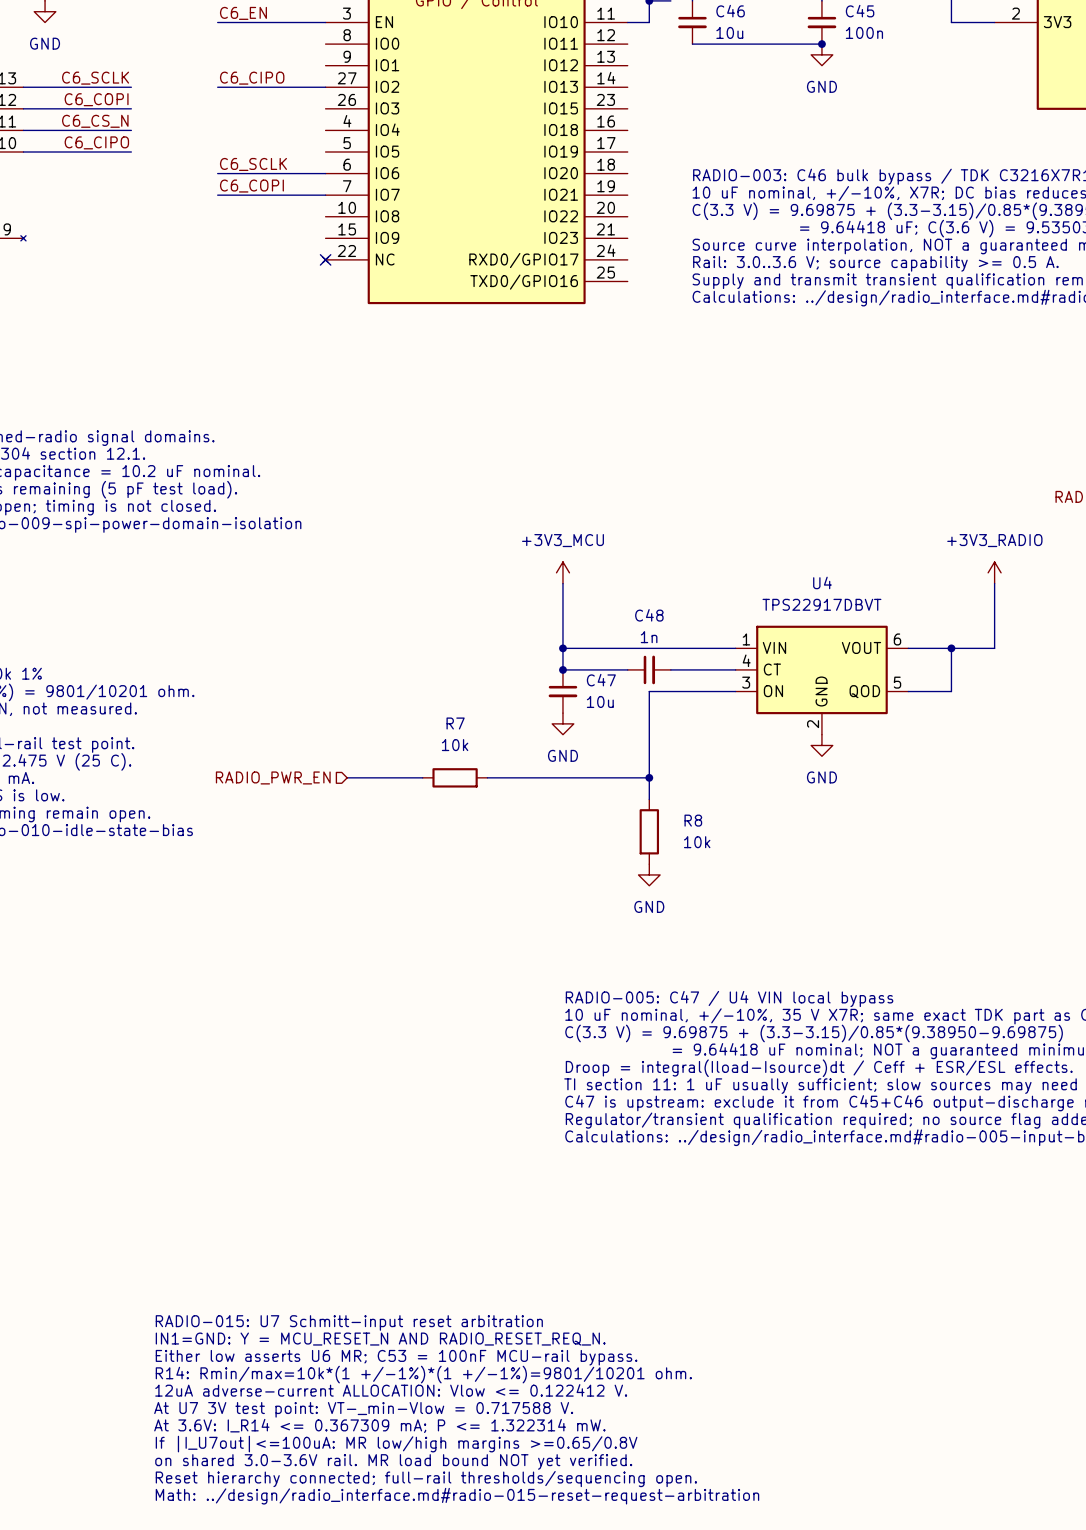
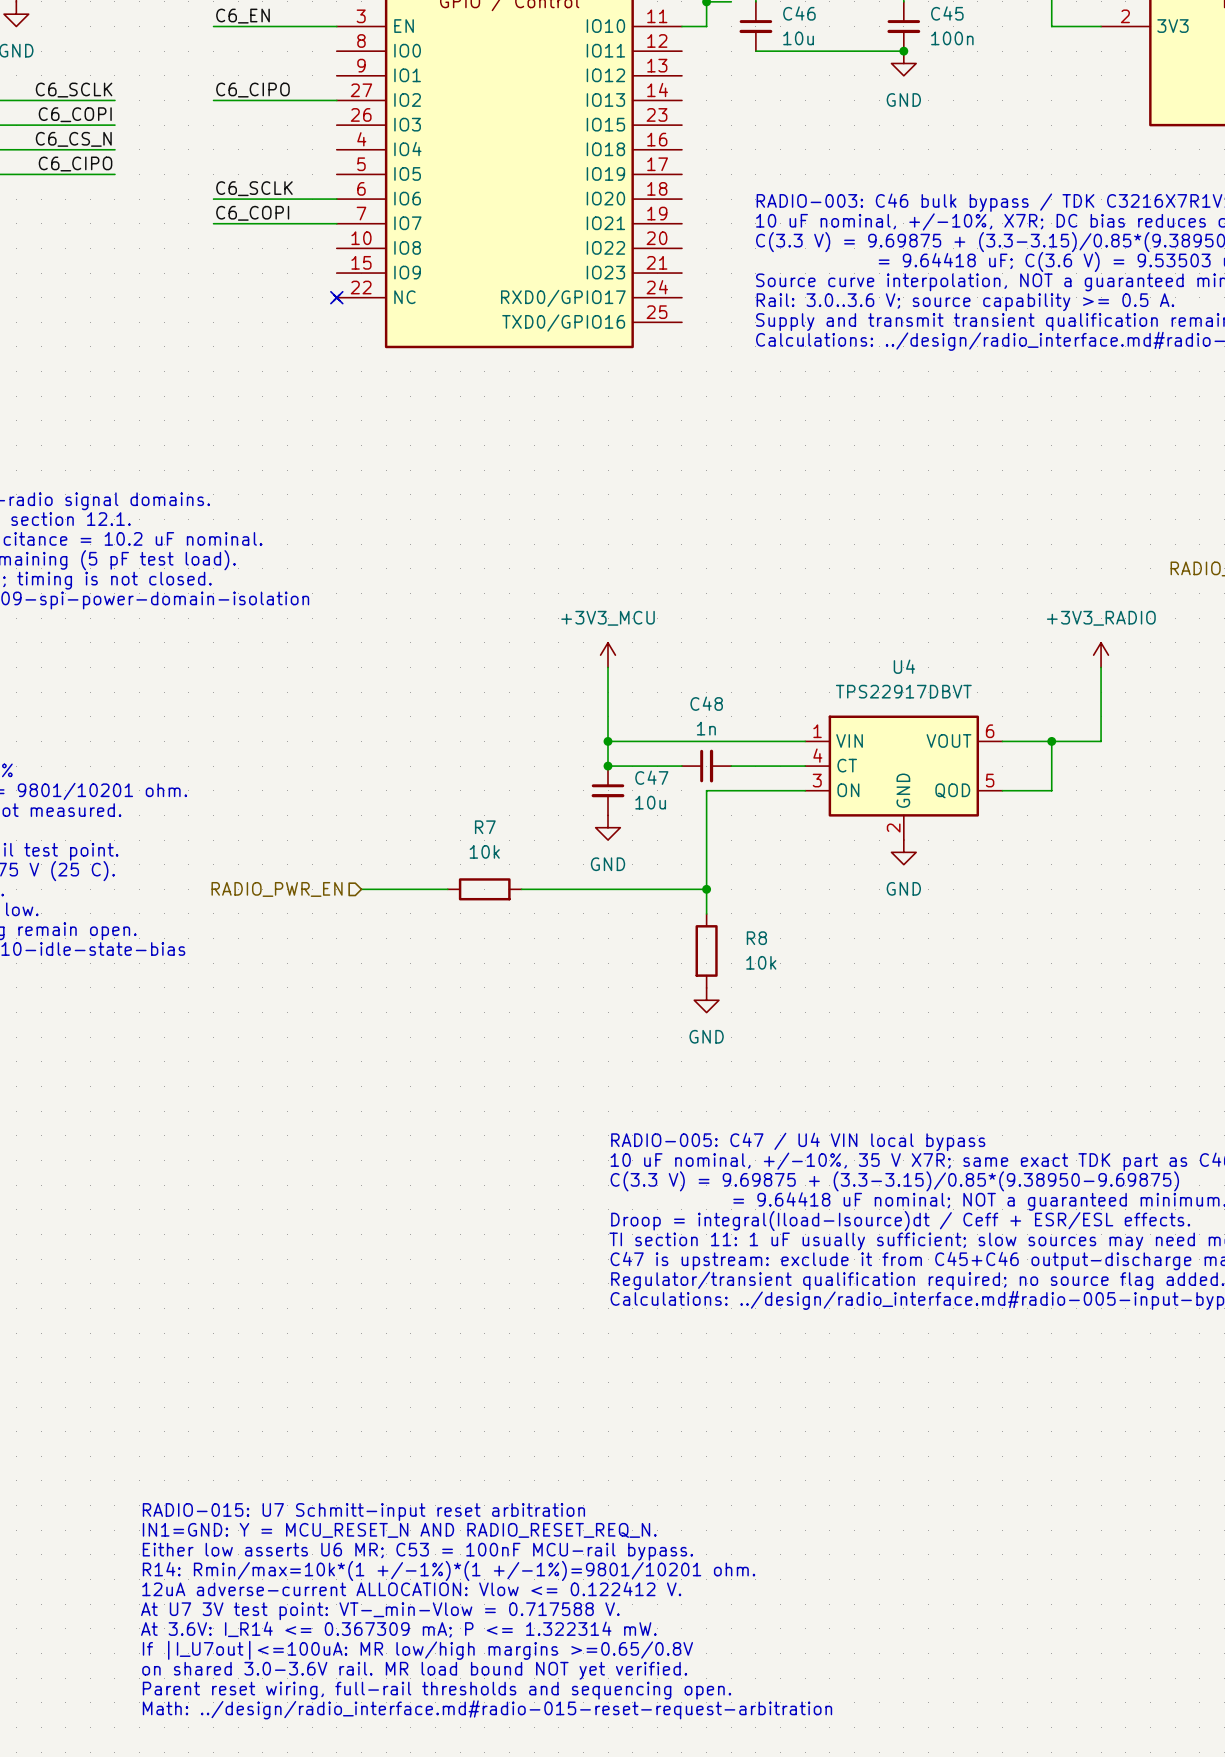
text: Reset hierarchy connected; full-rail thresholds/sequencing open. (426, 1479) -> Parent reset wiring, full-rail thresholds and sequencing open. (436, 1690)

